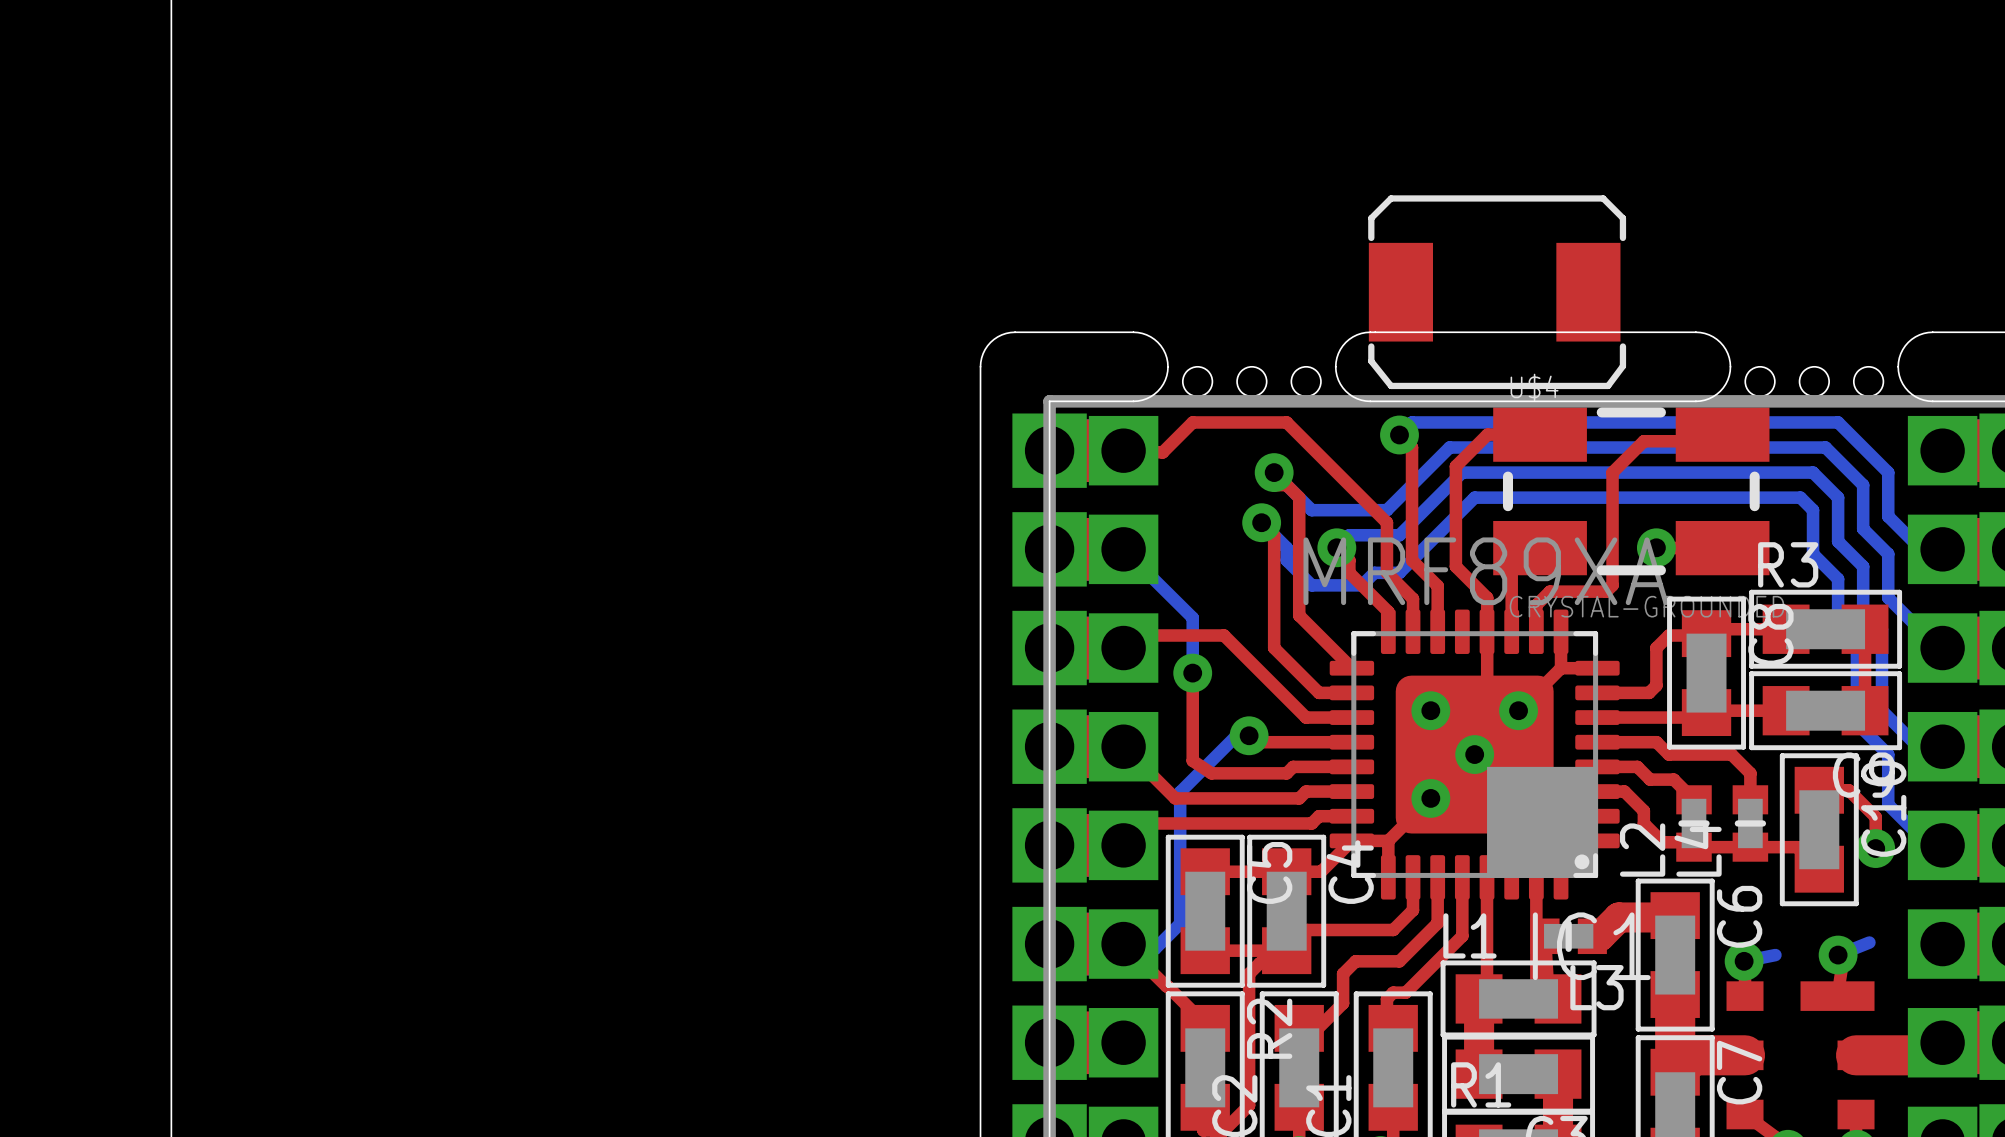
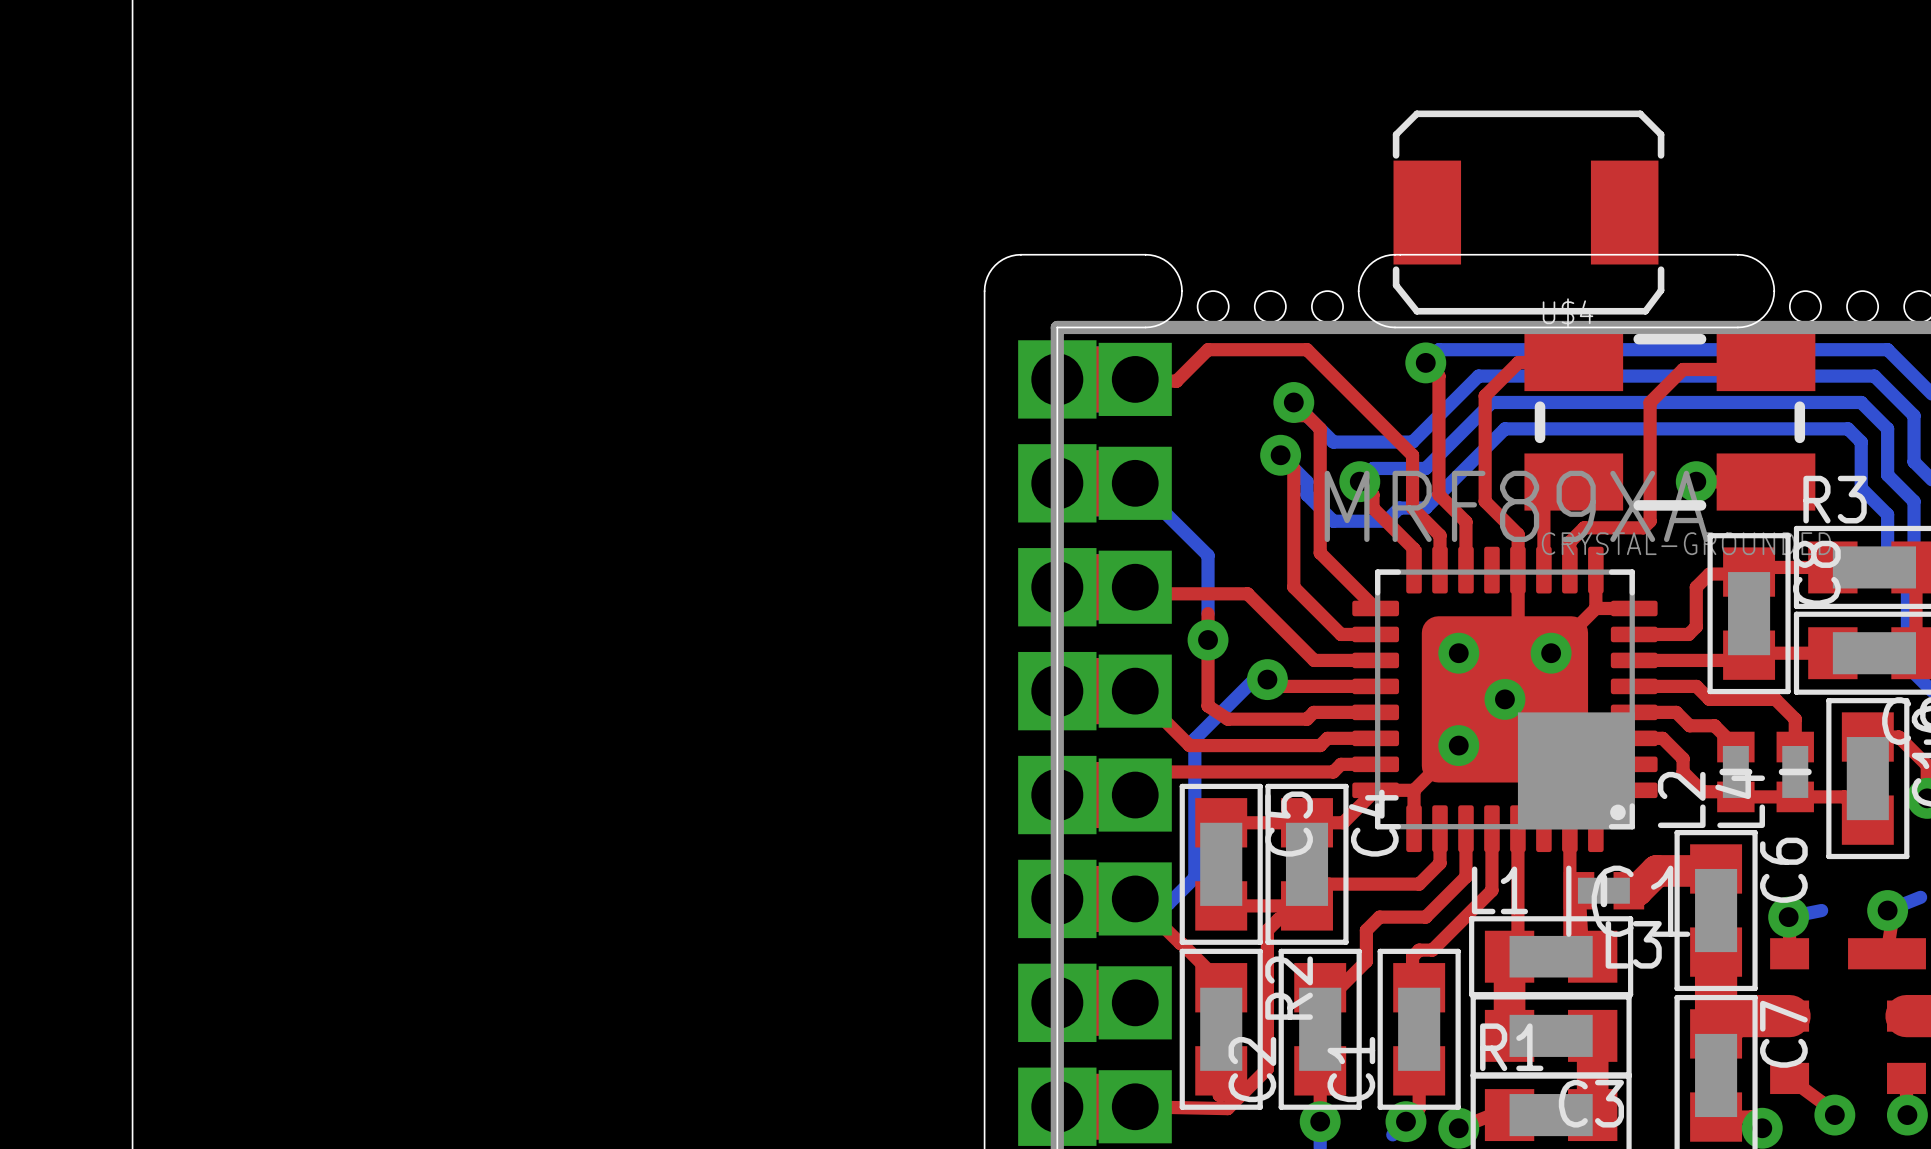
top track: (1123, 648) (1136, 635) (1224, 635) (1306, 717) -> (1135, 587) (1142, 593) (1247, 593) (1314, 660) (1327, 660)
via position: (1192, 673) -> (1208, 640)

